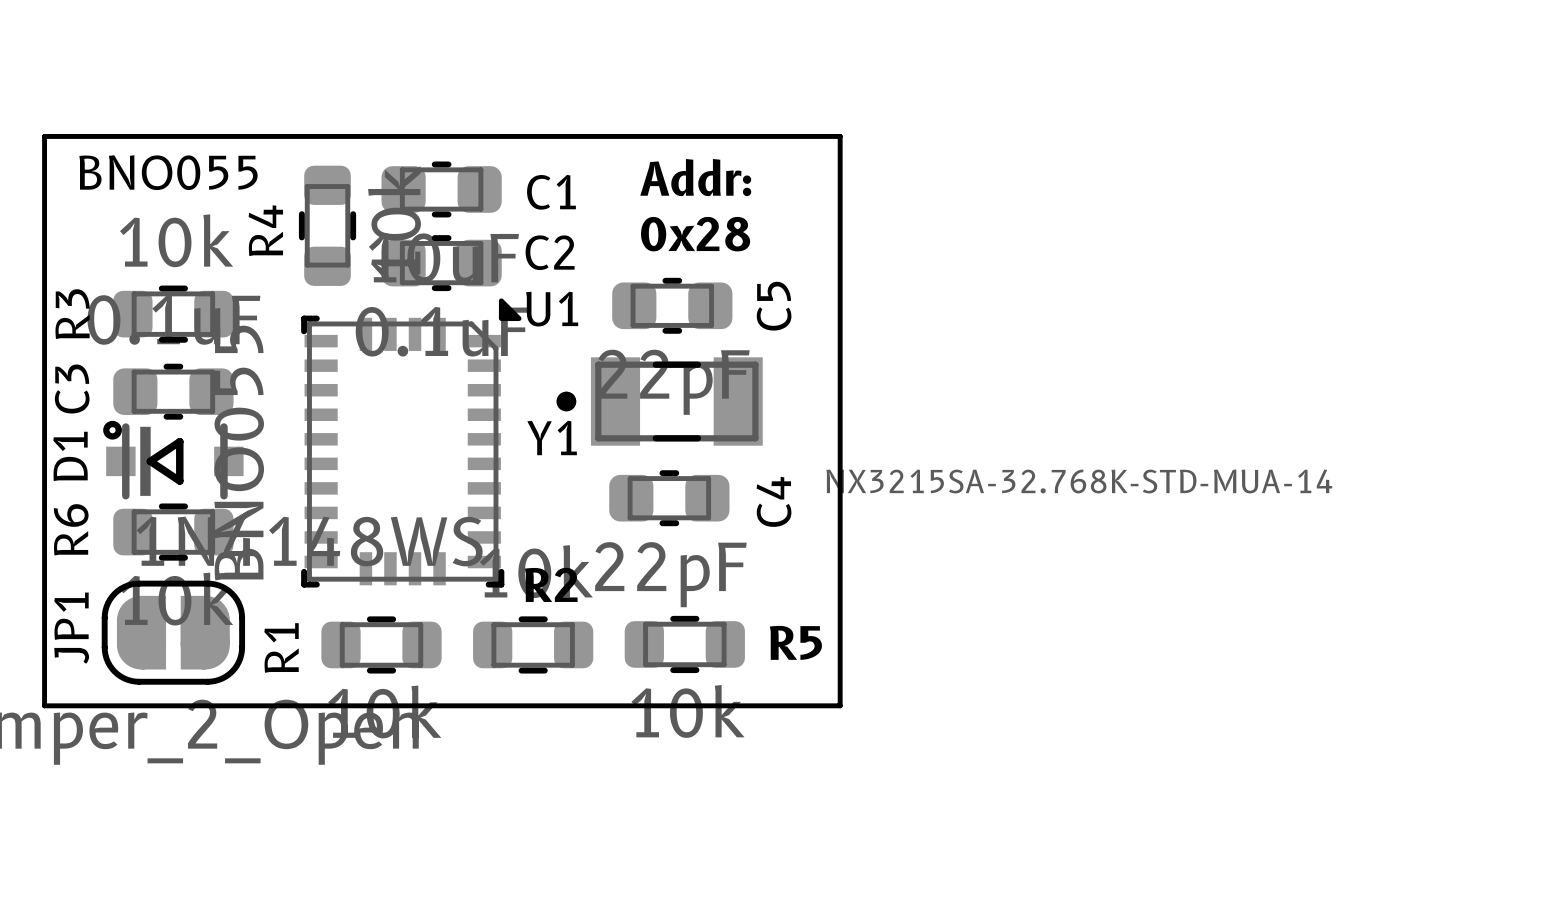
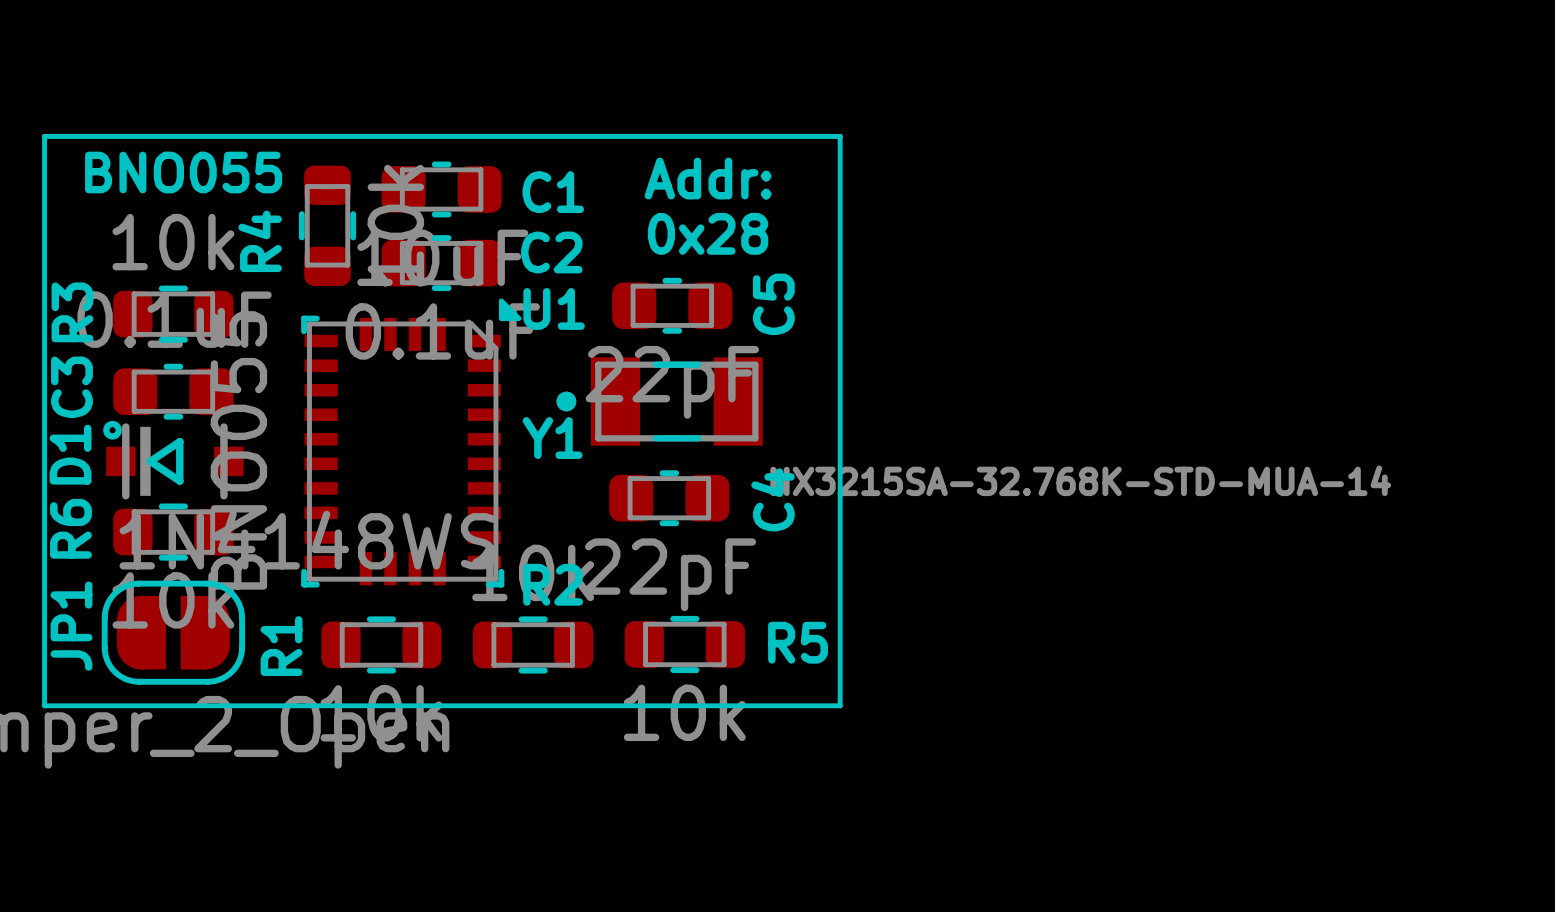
R4 name position: R4 (265, 230) -> R4 (260, 241)

